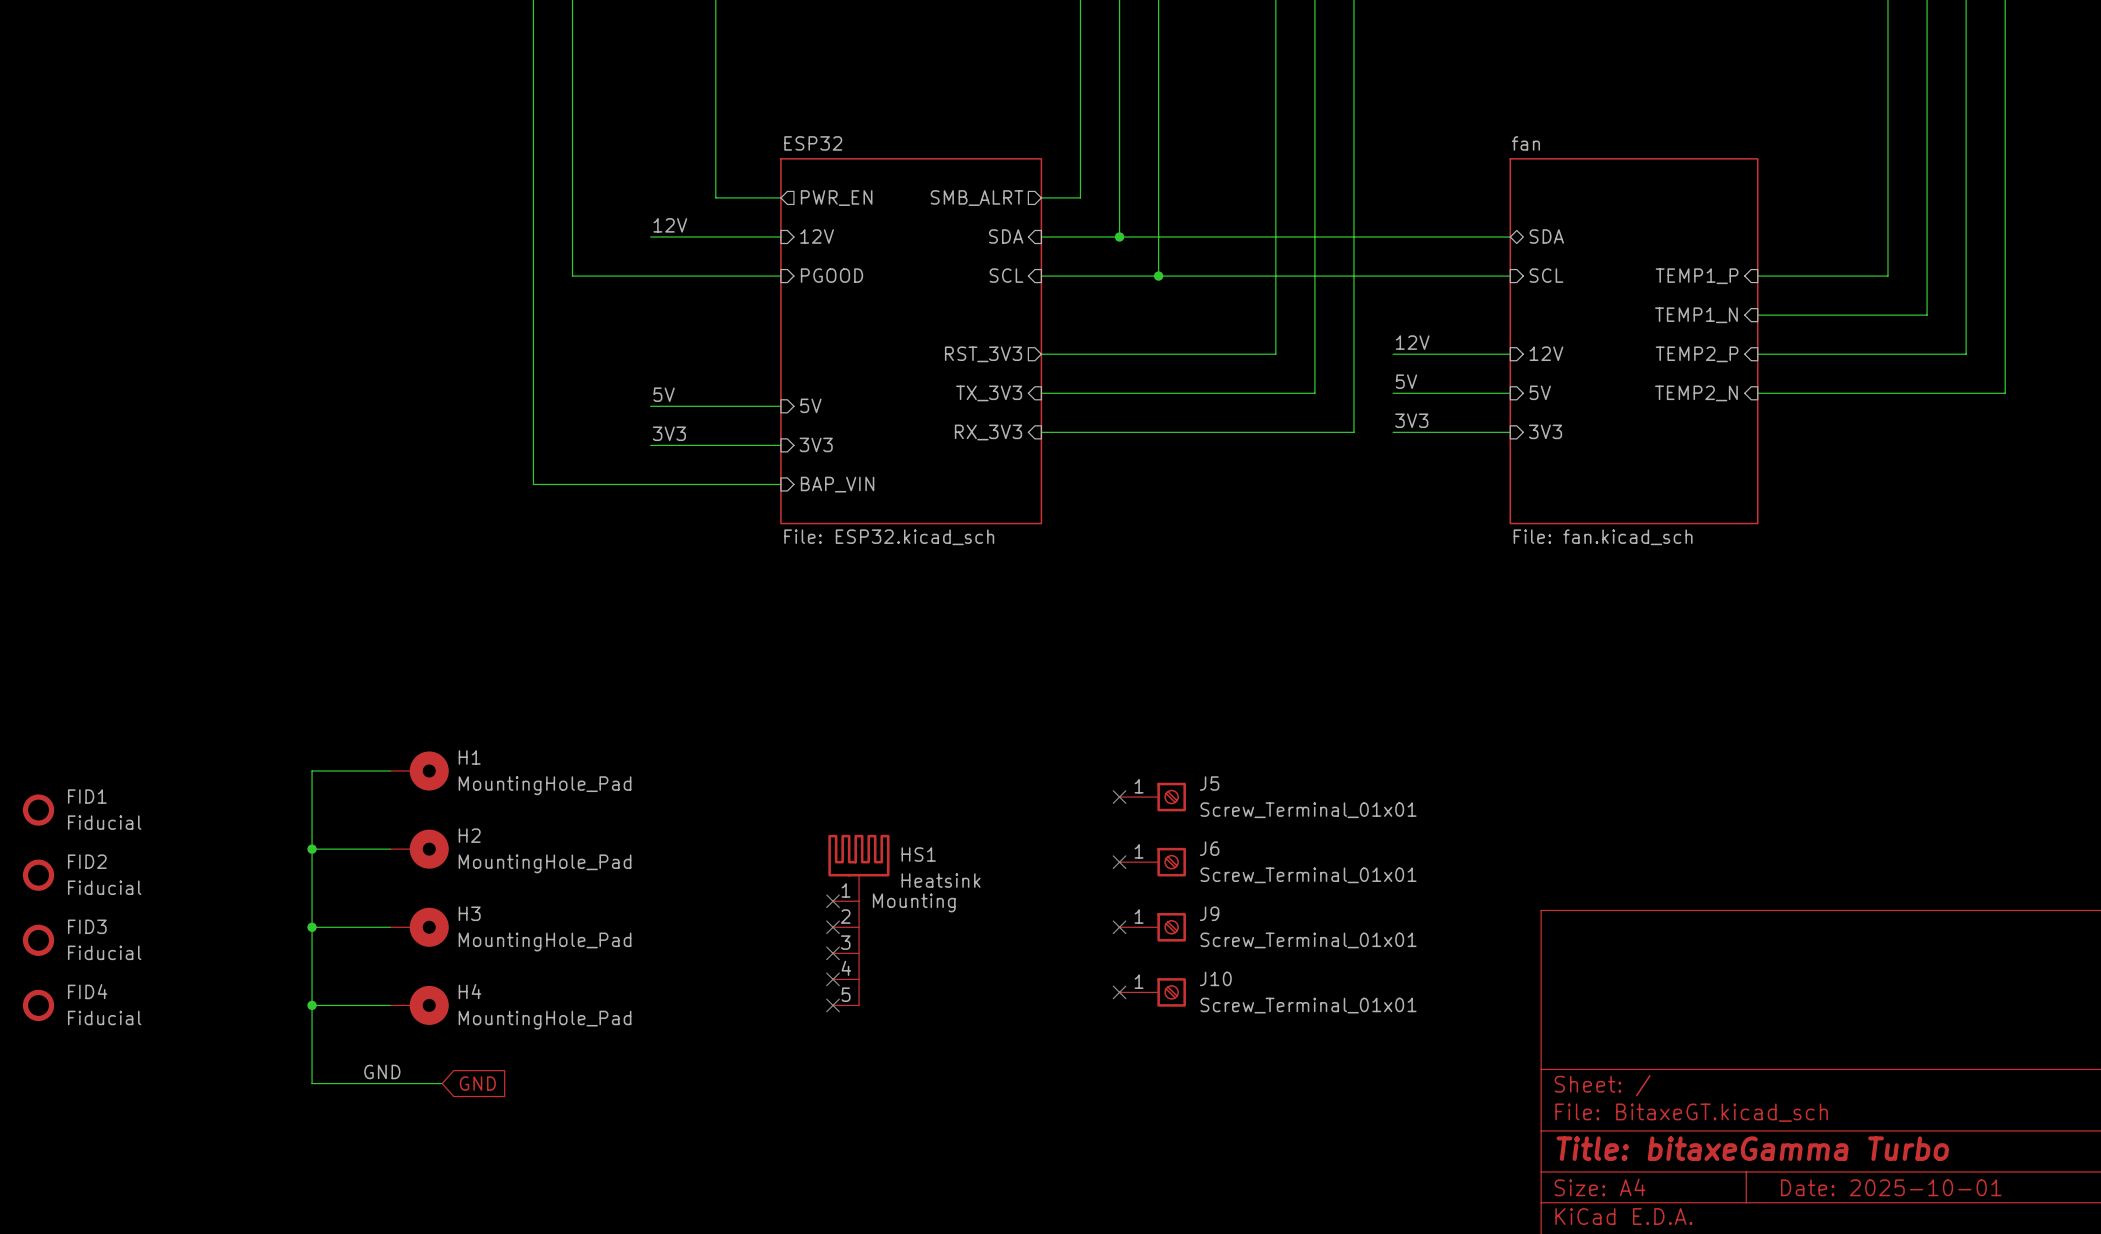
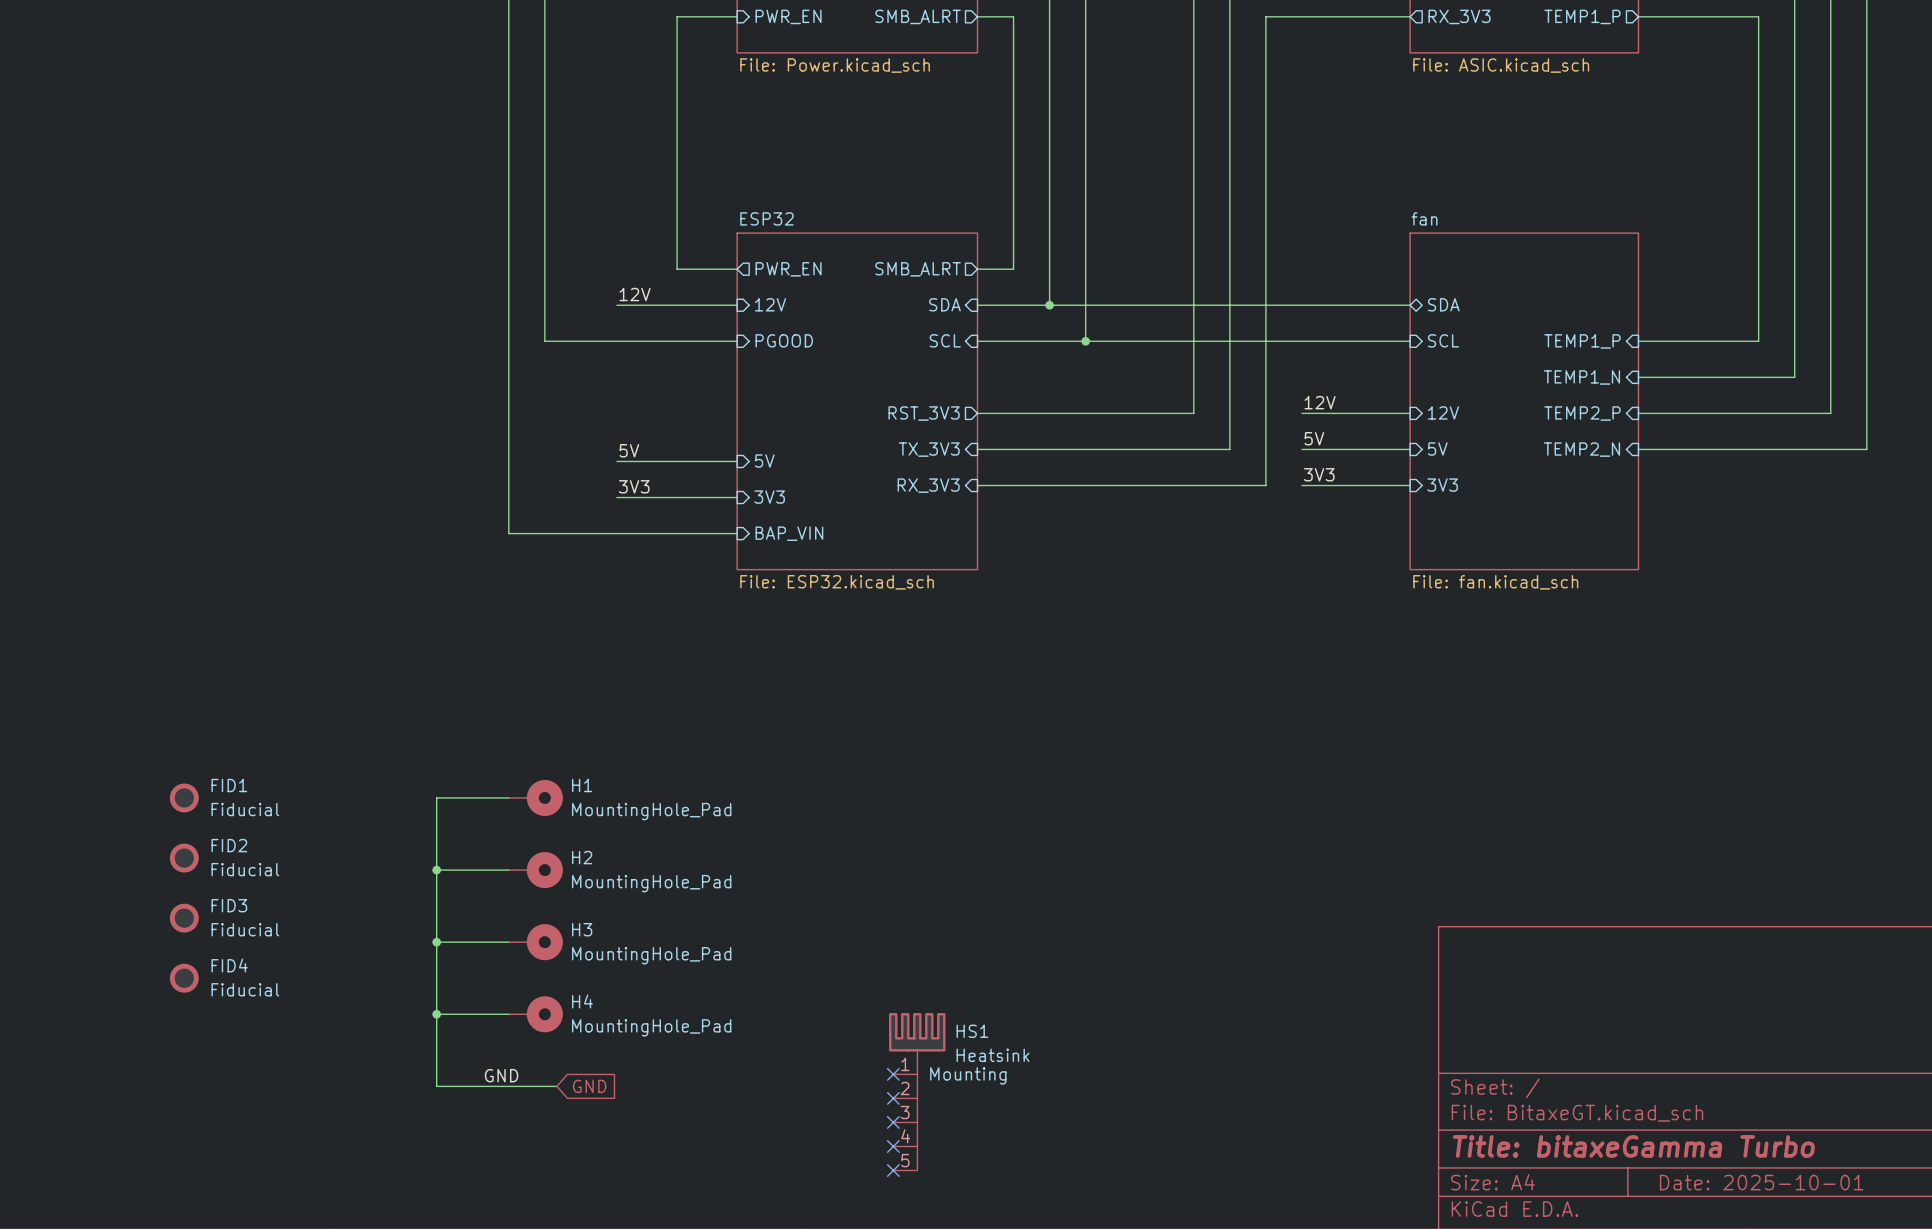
wire: (390, 770) (312, 770) (312, 1083) (442, 1083) -> (508, 797) (436, 797) (436, 1086) (556, 1086)
H1 position: (419, 770) -> (535, 797)
no-connect mark: (1119, 797) -> none
J5: Screw_Terminal_01x01 (1152, 797) -> none
FID1 position: (38, 810) -> (184, 797)
wire: (312, 849) (390, 849) -> (436, 870) (508, 870)
junction: (312, 849) -> none
H2 position: (419, 849) -> (535, 870)
junction: none -> (436, 870)
no-connect mark: (1119, 862) -> none
J6: Screw_Terminal_01x01 (1152, 862) -> none
FID2 position: (38, 875) -> (184, 858)
no-connect mark: (833, 901) -> none
HS1 position: (858, 920) -> (917, 1091)
wire: (312, 927) (390, 927) -> (436, 942) (508, 942)
junction: (312, 927) -> none
H3 position: (419, 927) -> (535, 942)
junction: none -> (436, 942)
no-connect mark: (833, 927) -> none
no-connect mark: (1119, 927) -> none
J9: Screw_Terminal_01x01 (1152, 927) -> none
FID3 position: (38, 940) -> (184, 918)
no-connect mark: (833, 953) -> none
no-connect mark: (833, 979) -> none
no-connect mark: (1119, 992) -> none
J10: Screw_Terminal_01x01 (1152, 992) -> none
FID4 position: (38, 1005) -> (184, 978)
wire: (312, 1005) (390, 1005) -> (436, 1014) (508, 1014)
junction: (312, 1005) -> none
H4 position: (419, 1005) -> (535, 1014)
junction: none -> (436, 1014)
no-connect mark: (833, 1005) -> none
no-connect mark: none -> (893, 1074)
label position: GND (382, 1071) -> GND (501, 1075)
global label position: GND (477, 1083) -> GND (589, 1086)
no-connect mark: none -> (893, 1098)
no-connect mark: none -> (893, 1122)
no-connect mark: none -> (893, 1146)
no-connect mark: none -> (893, 1170)

